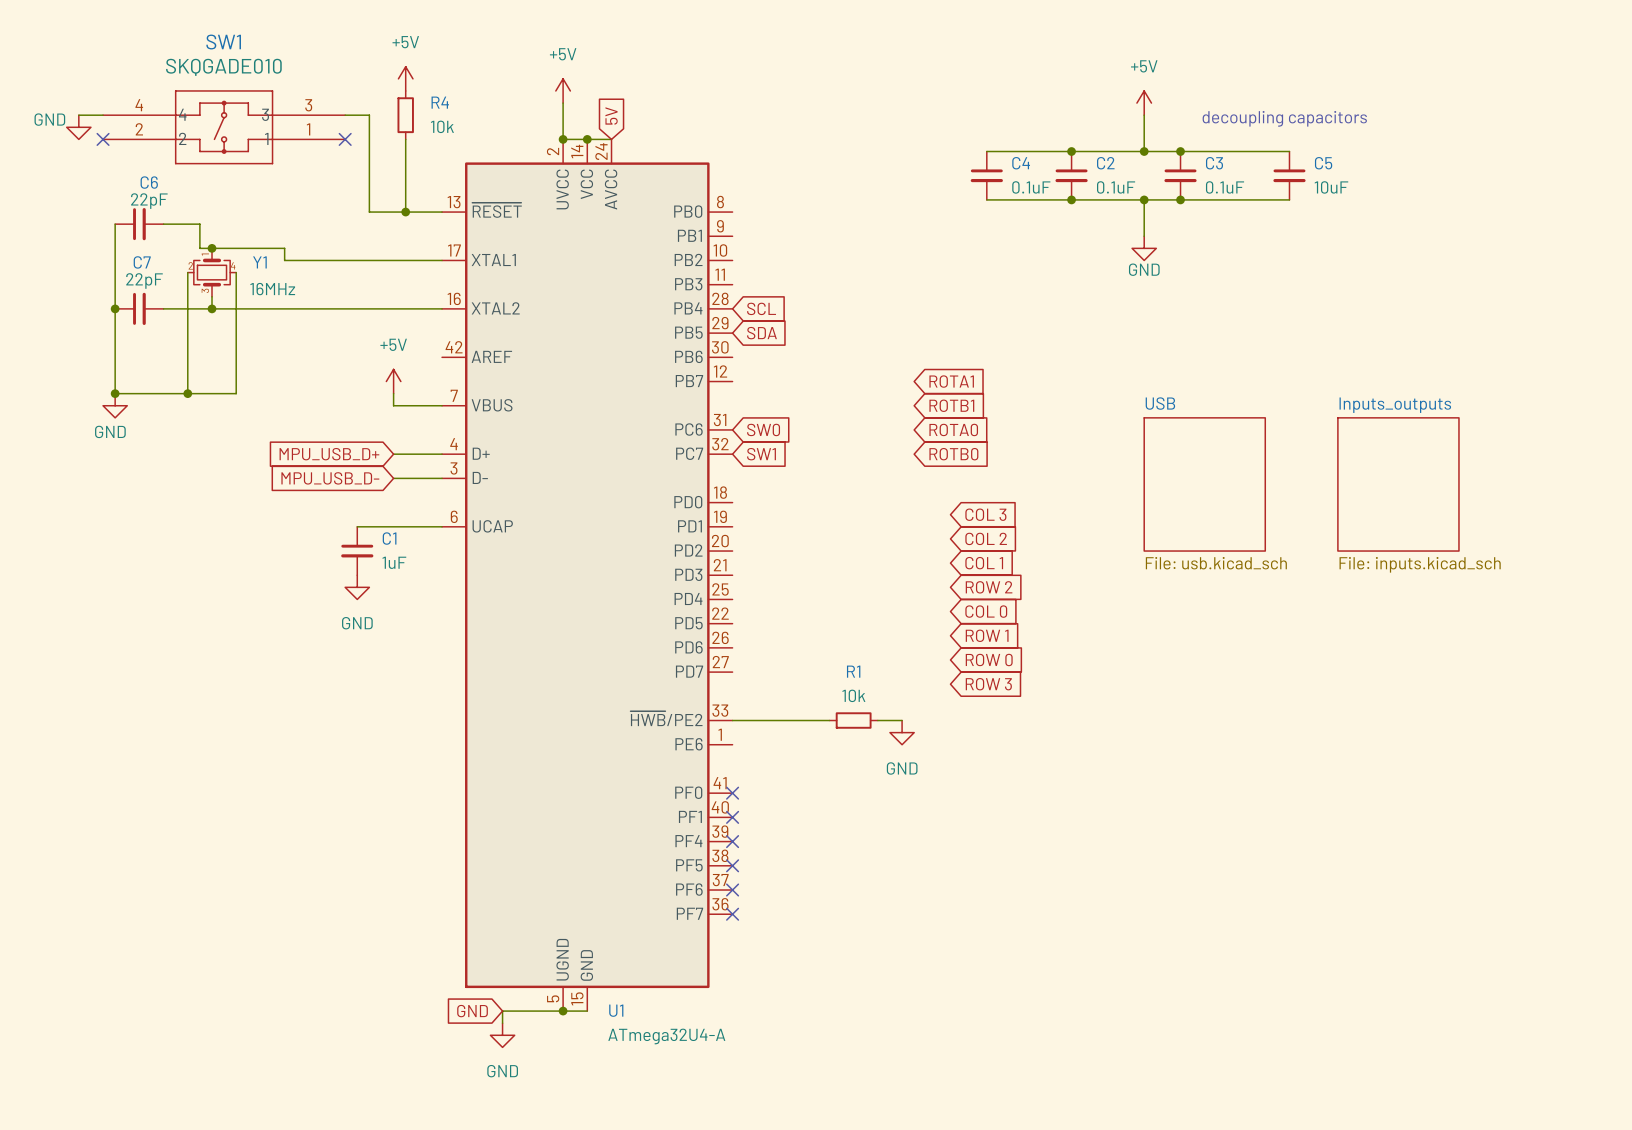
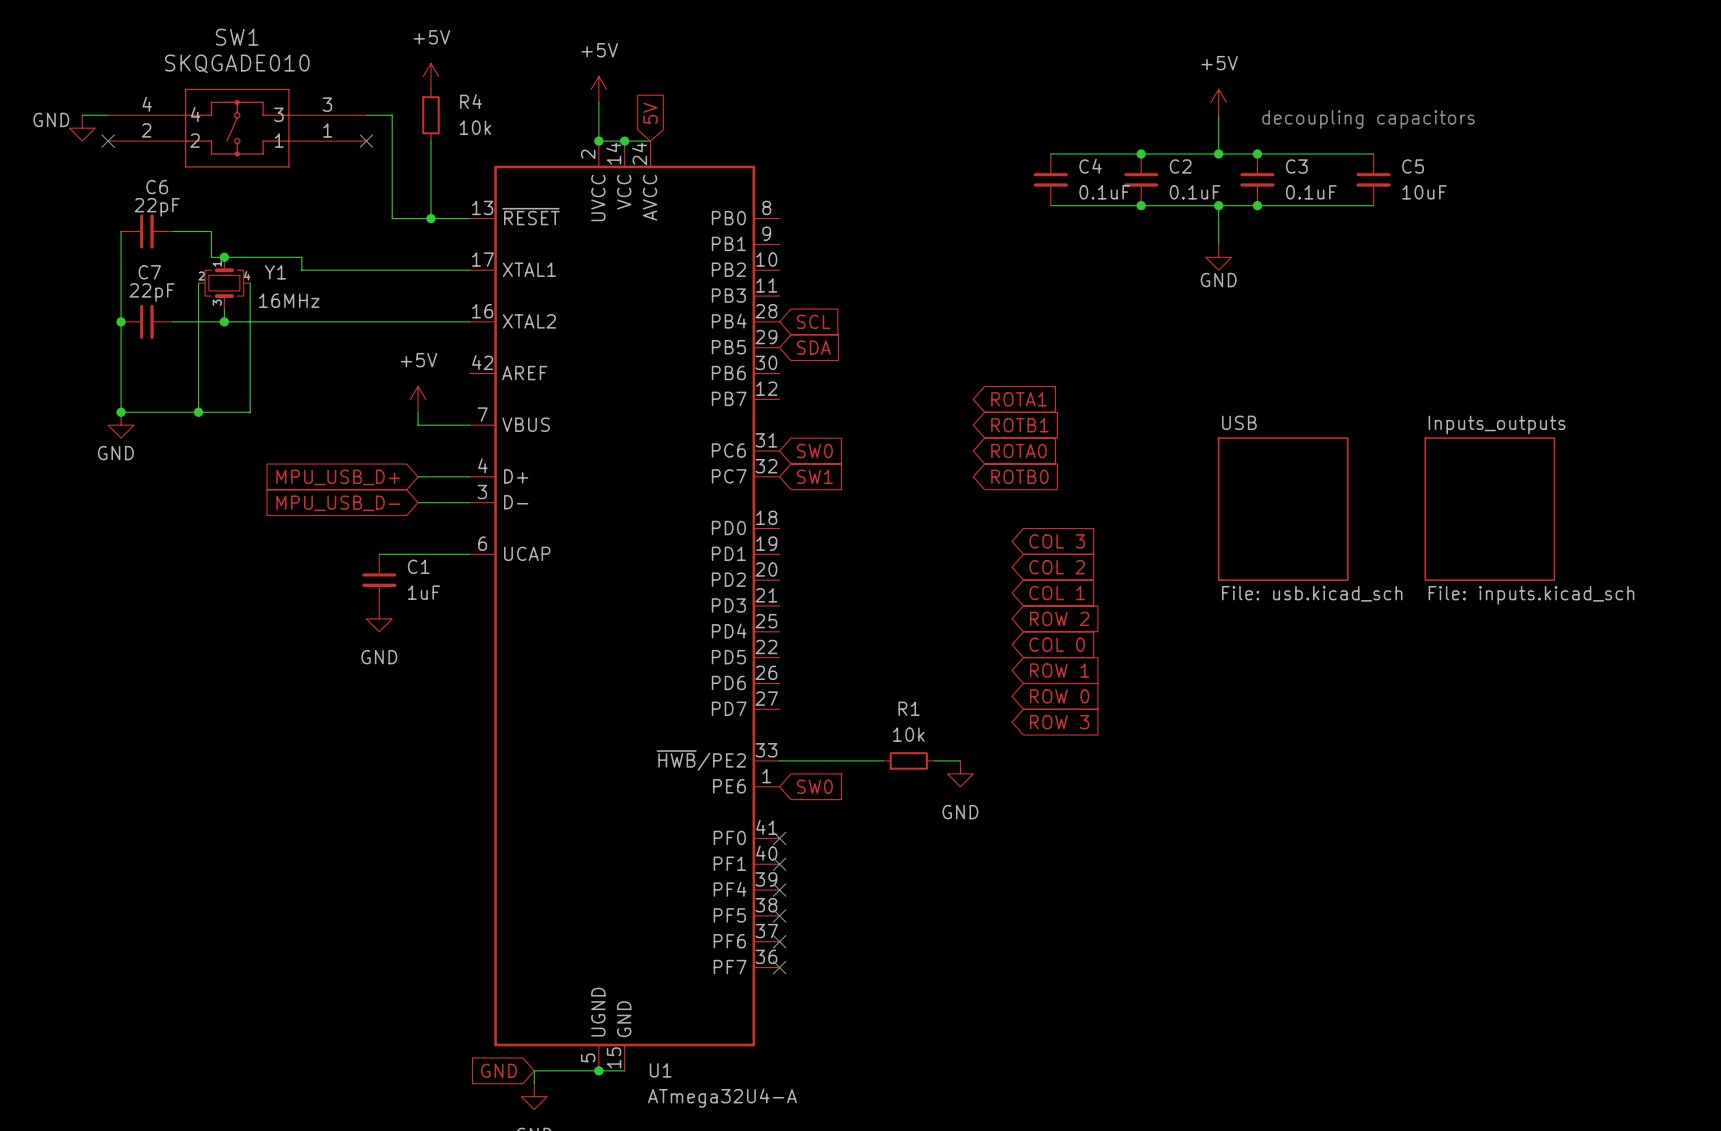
global label: none -> SW0 (814, 786)

